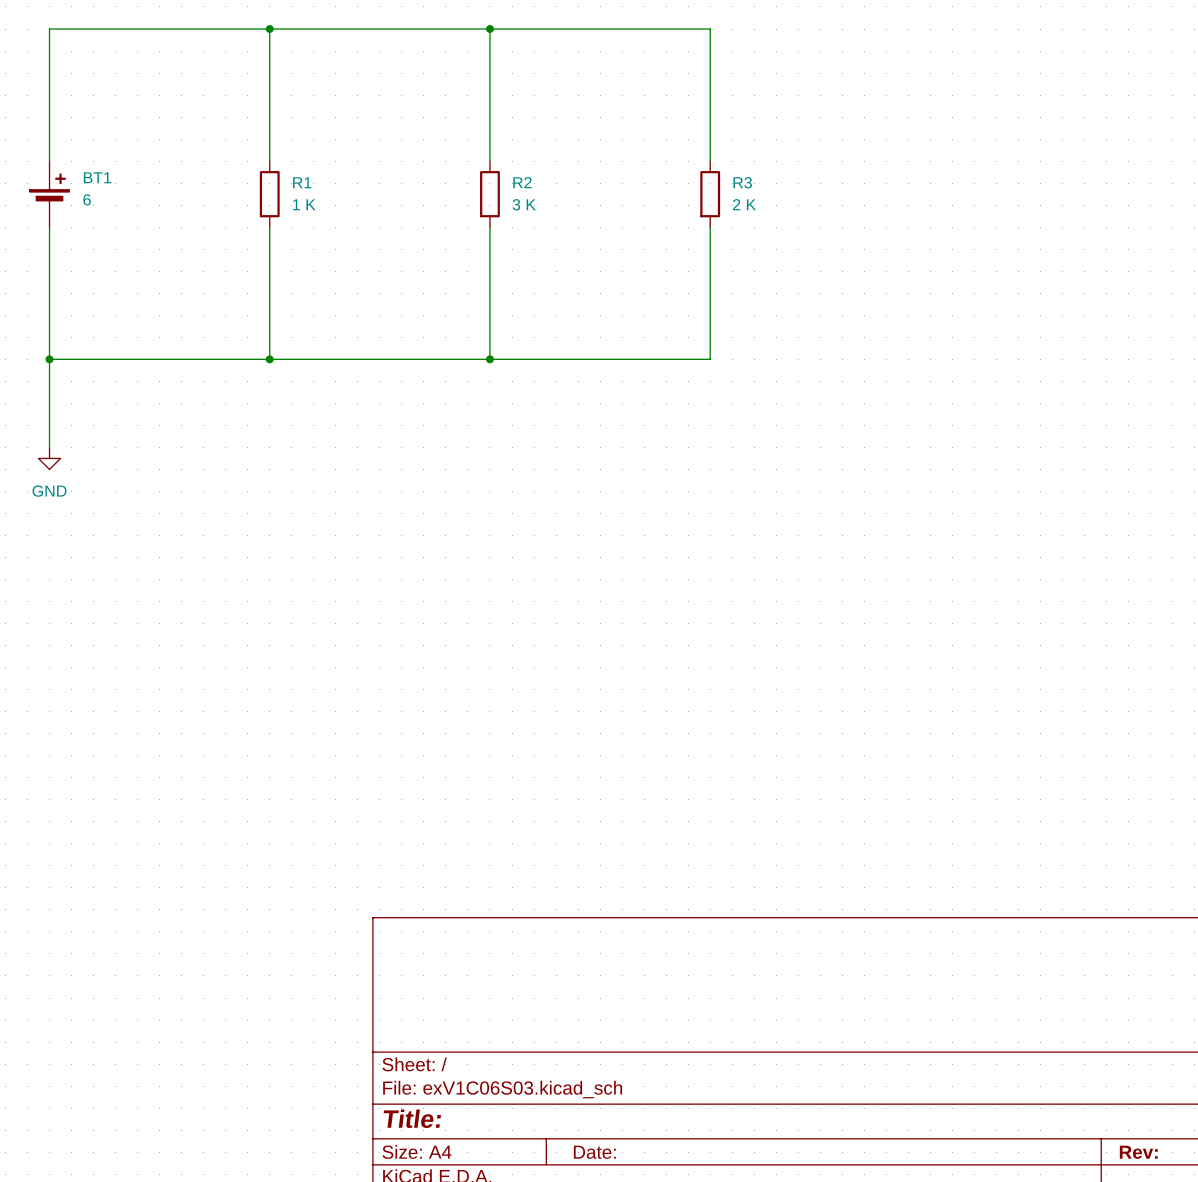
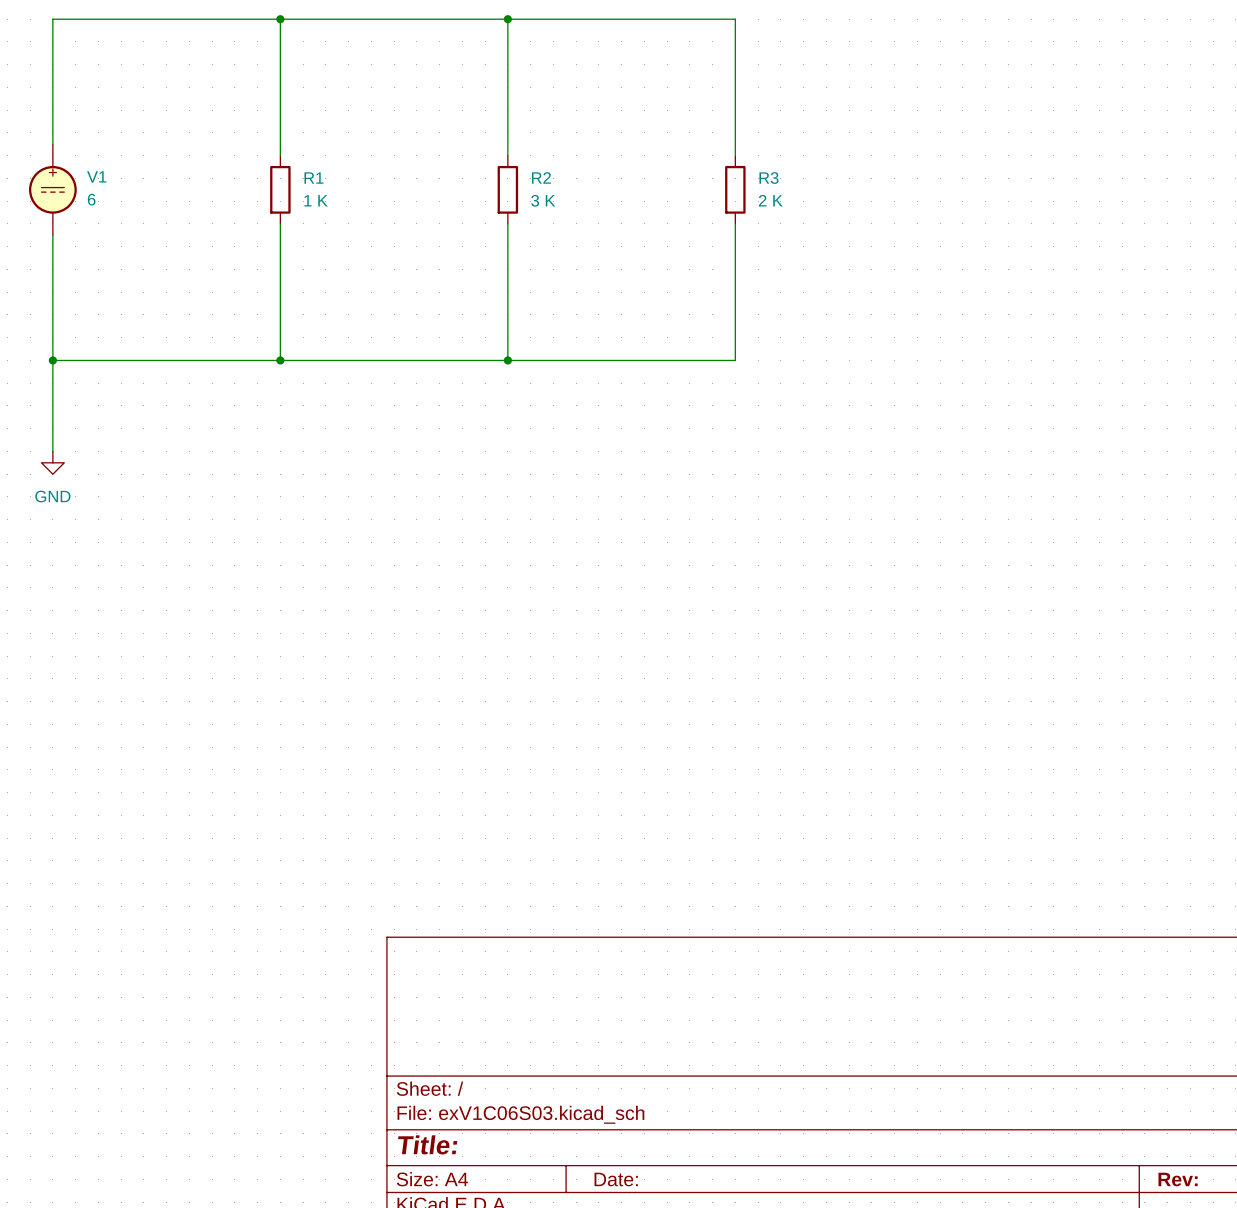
BT1: 6 (49, 194) -> none
V1: none -> 6 (52, 189)

